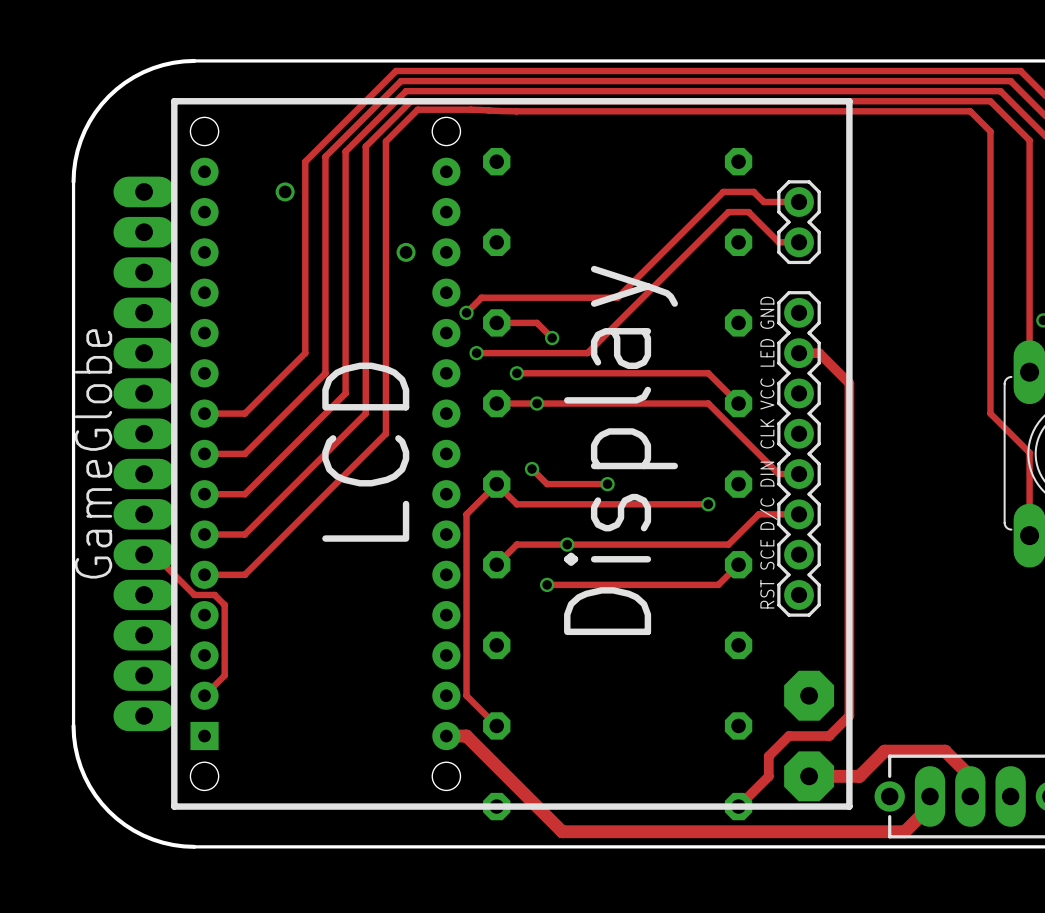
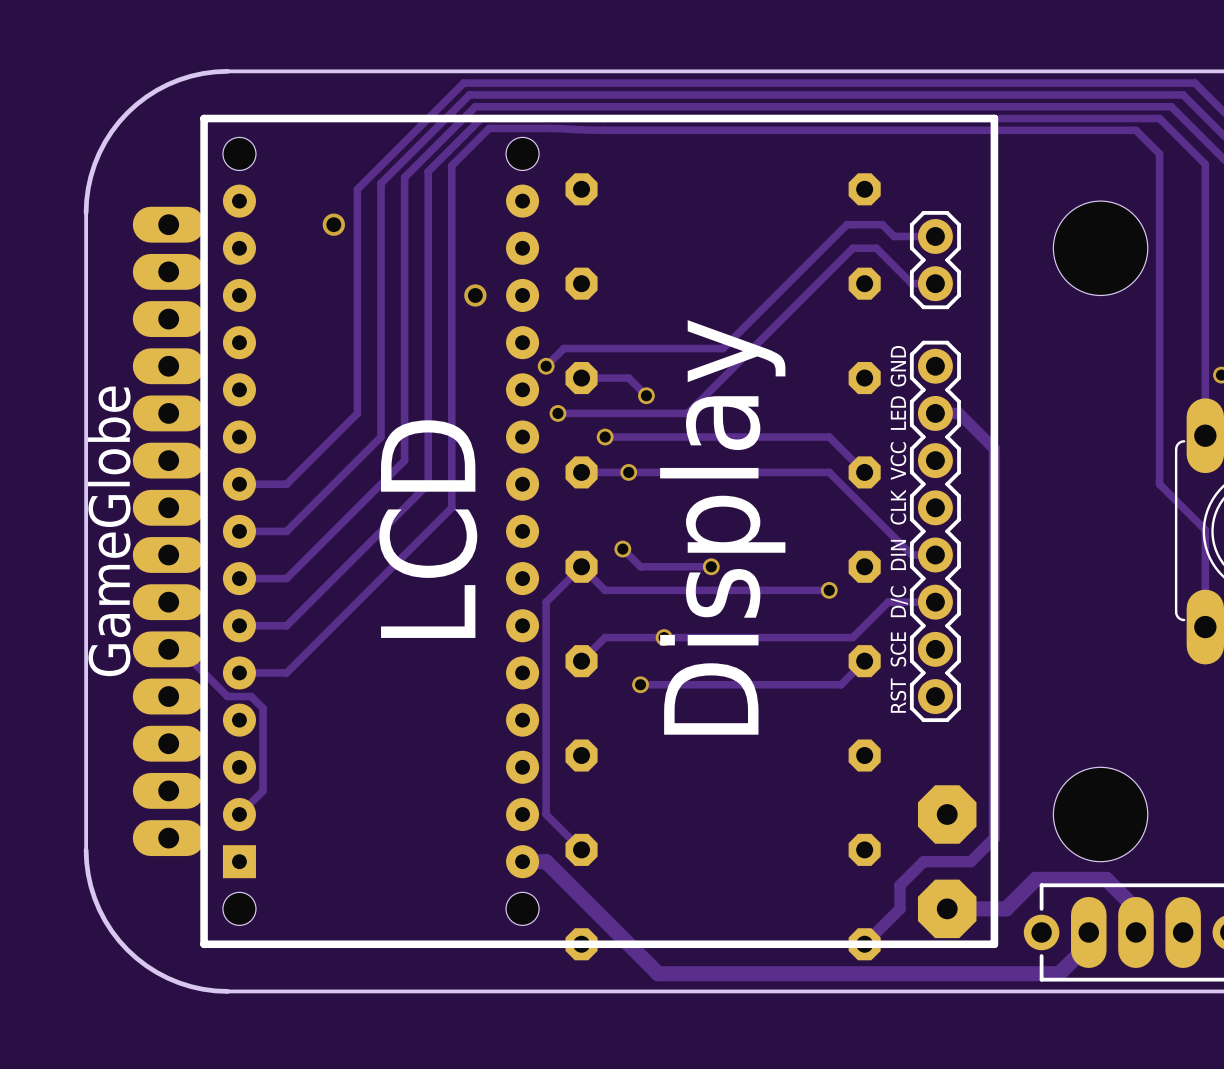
hole: none -> (1100, 248)
hole: none -> (1100, 814)

